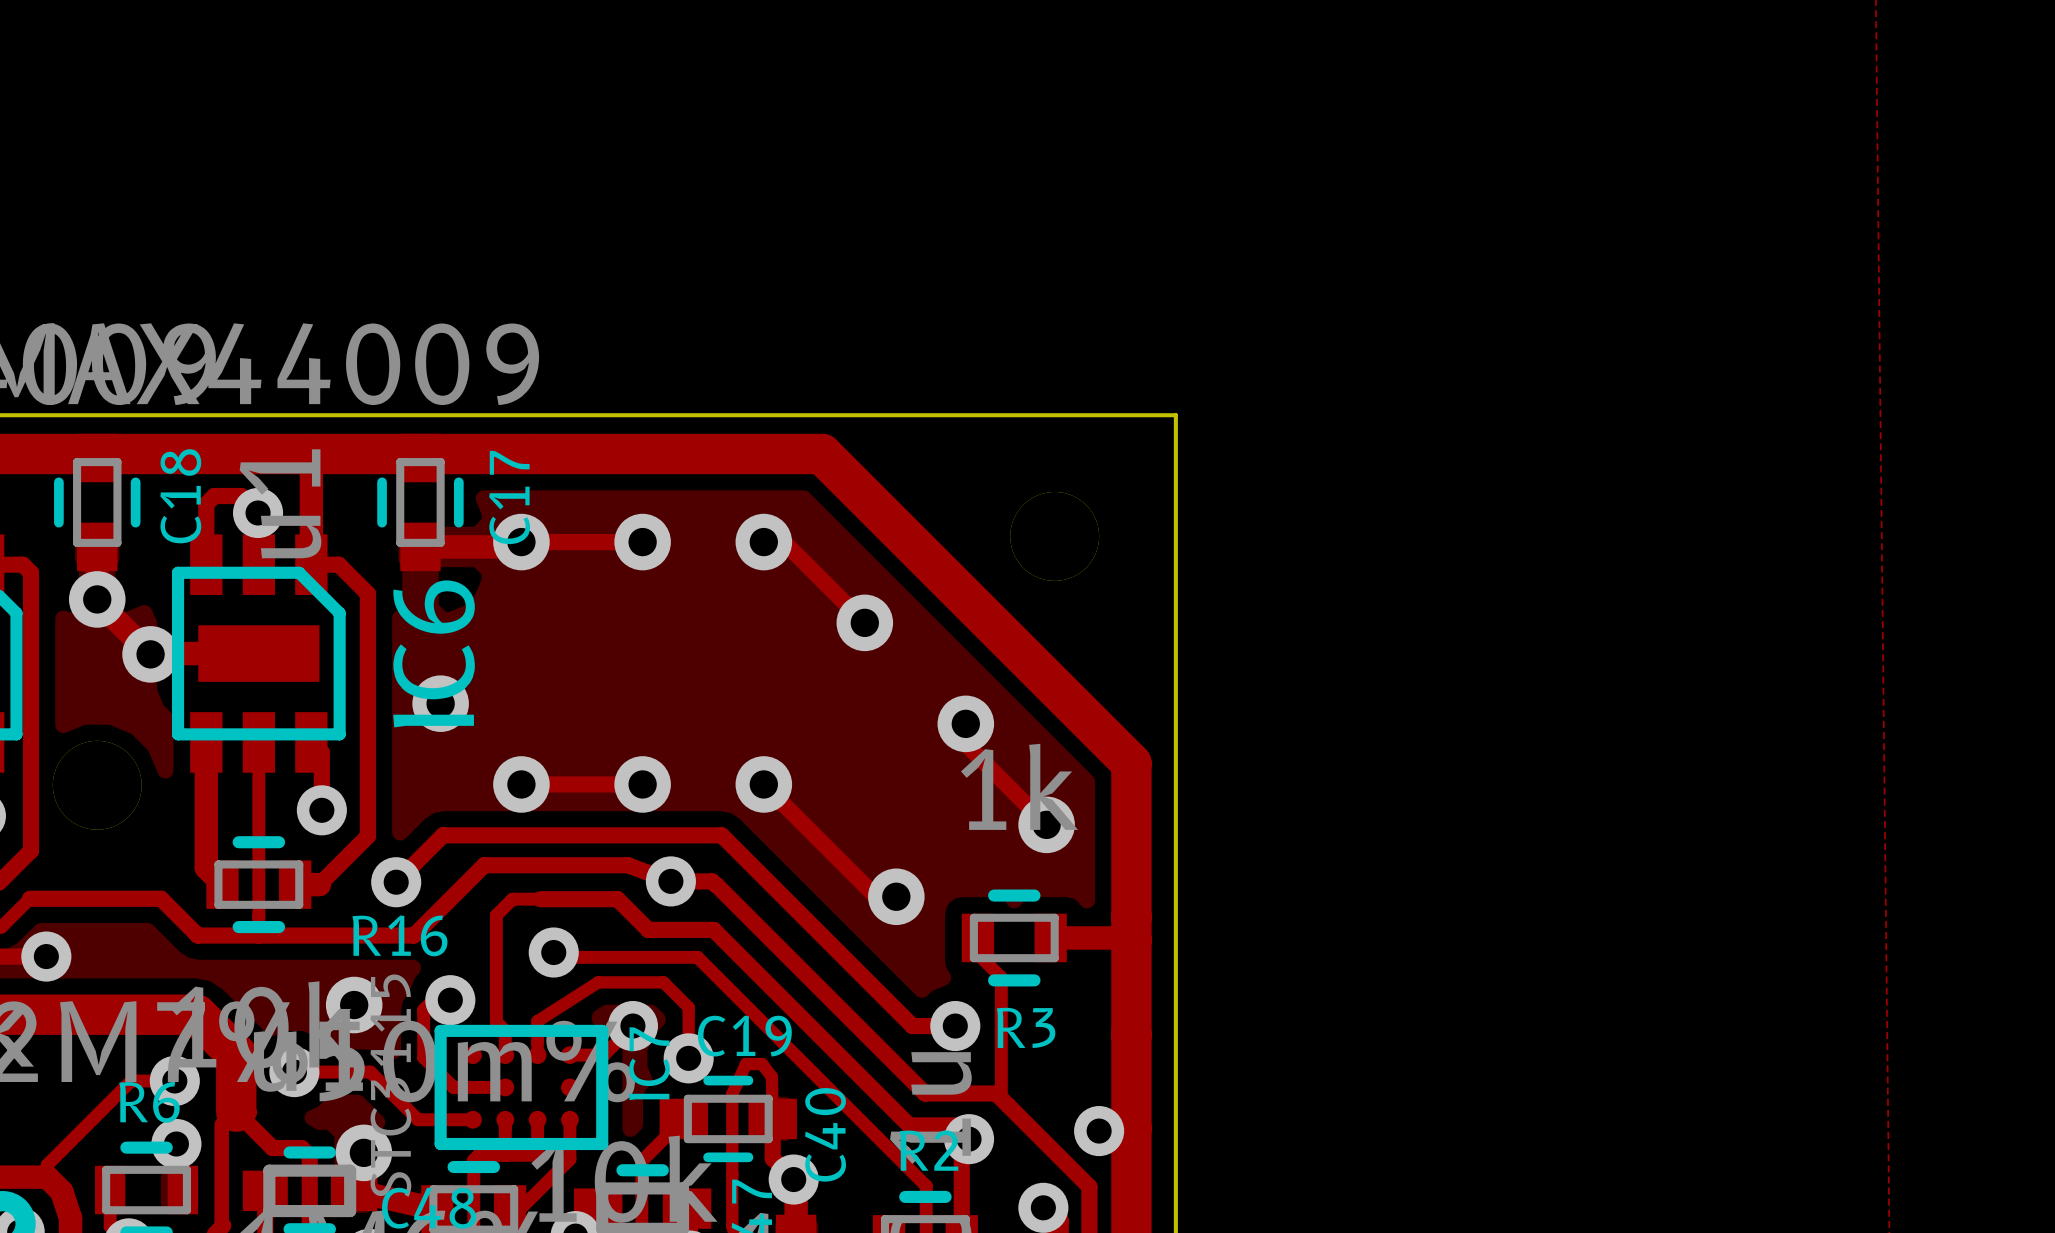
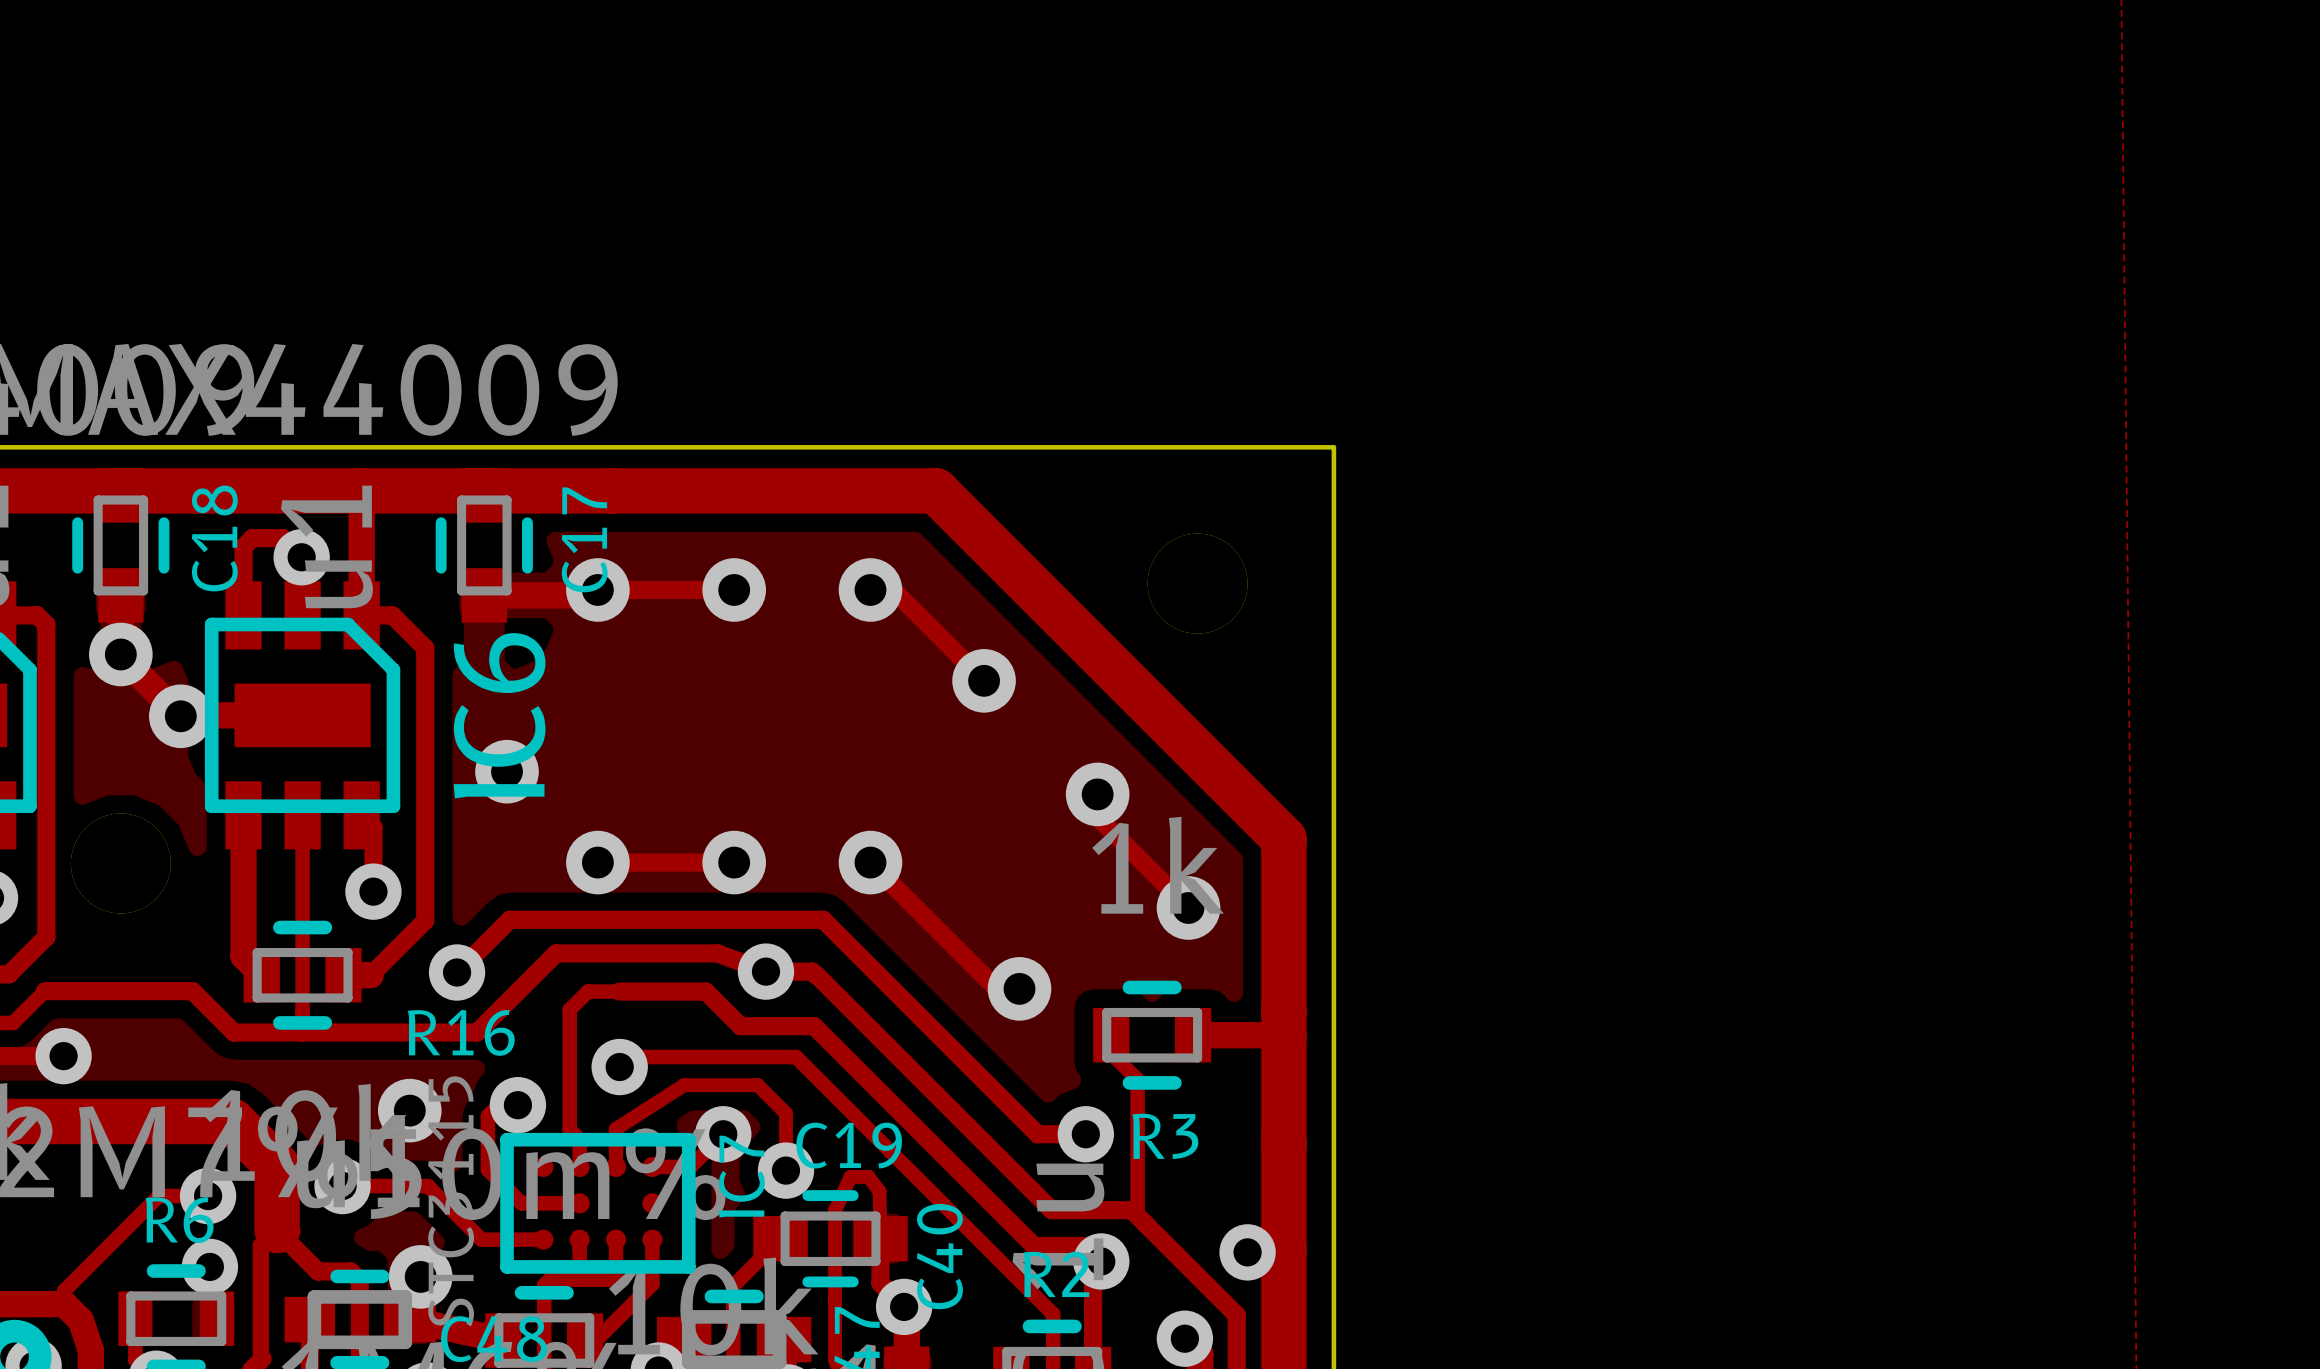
via position: (553, 952) -> (619, 1067)

